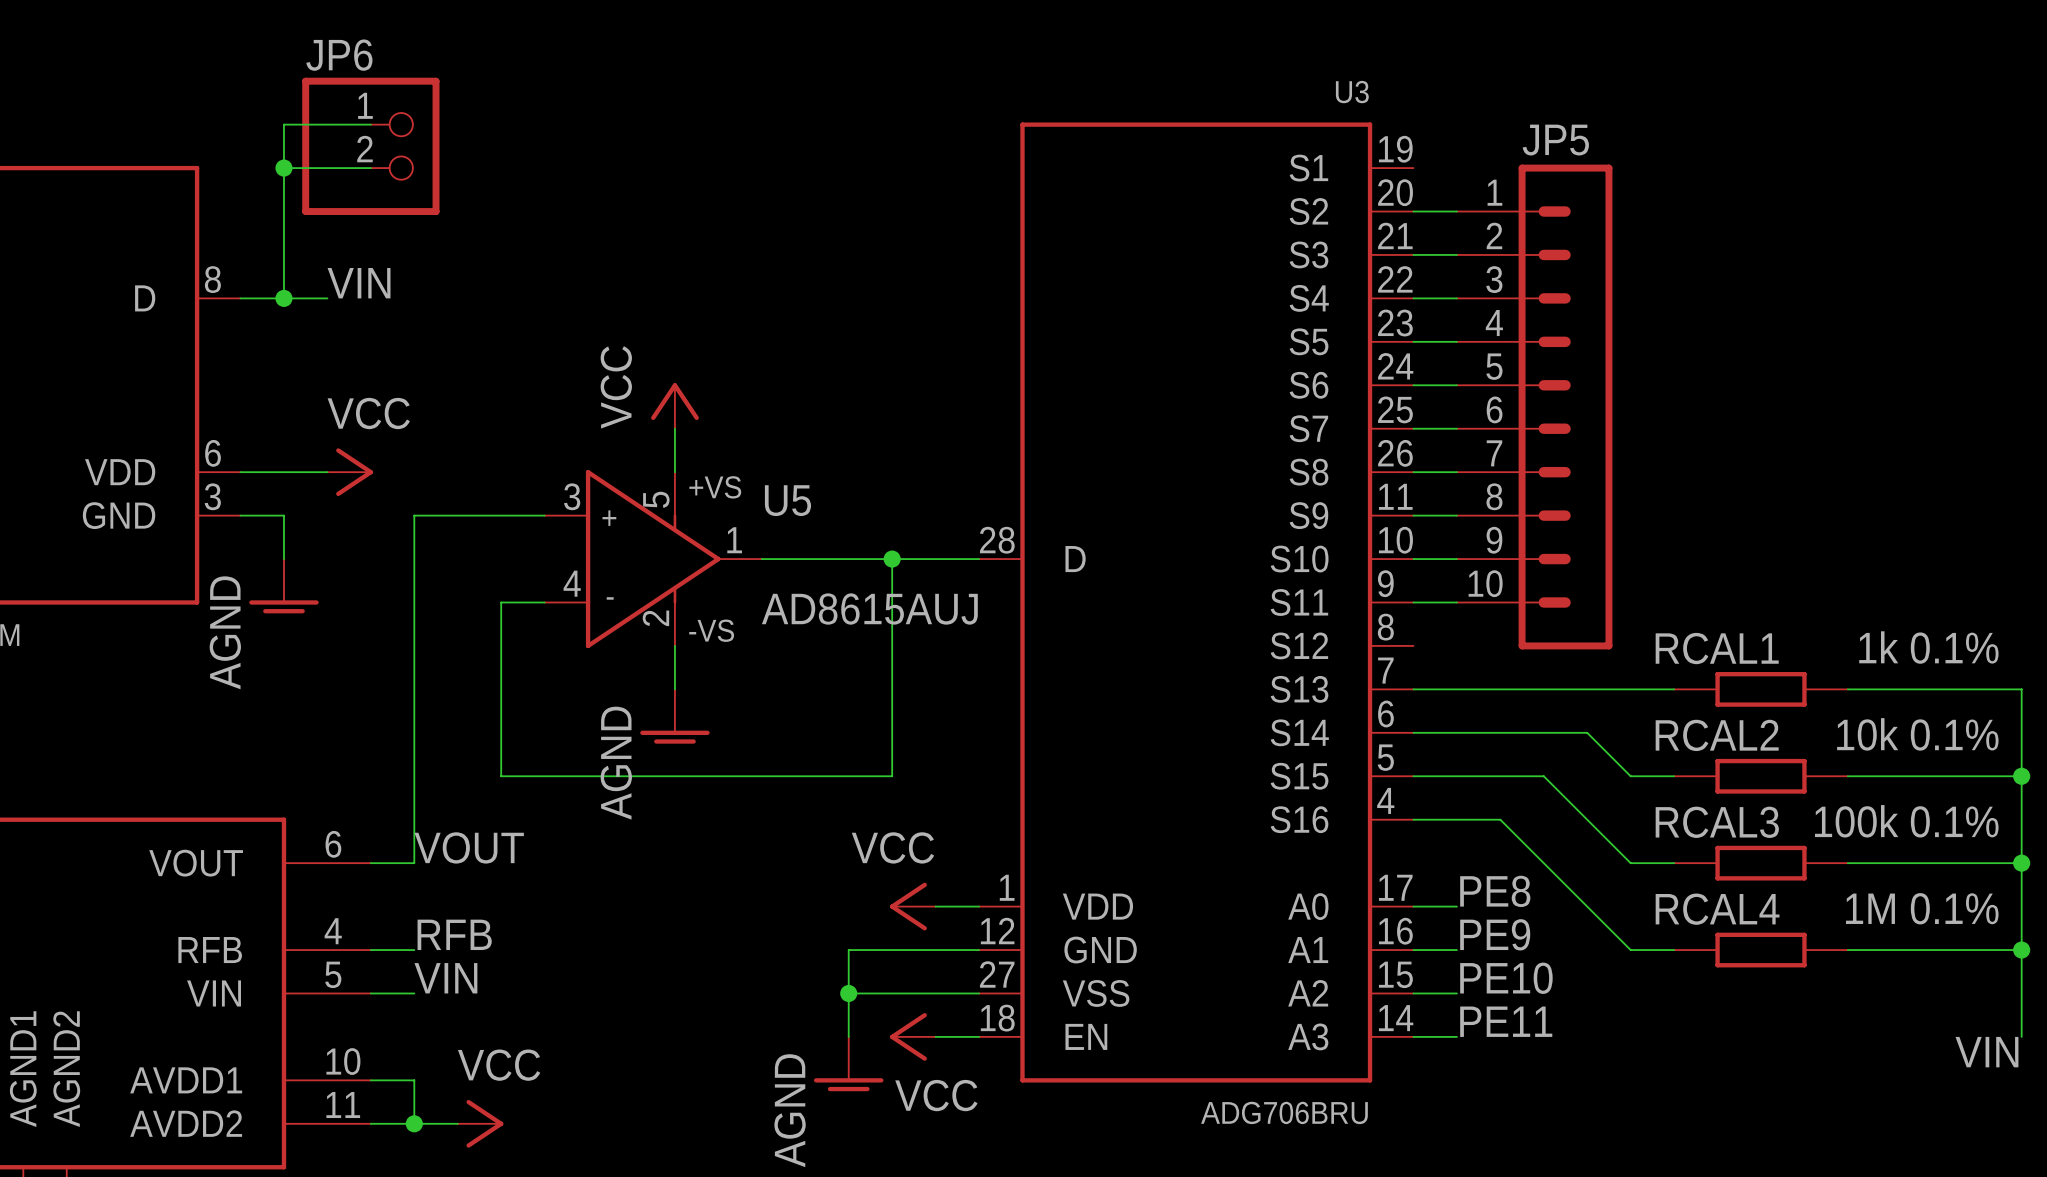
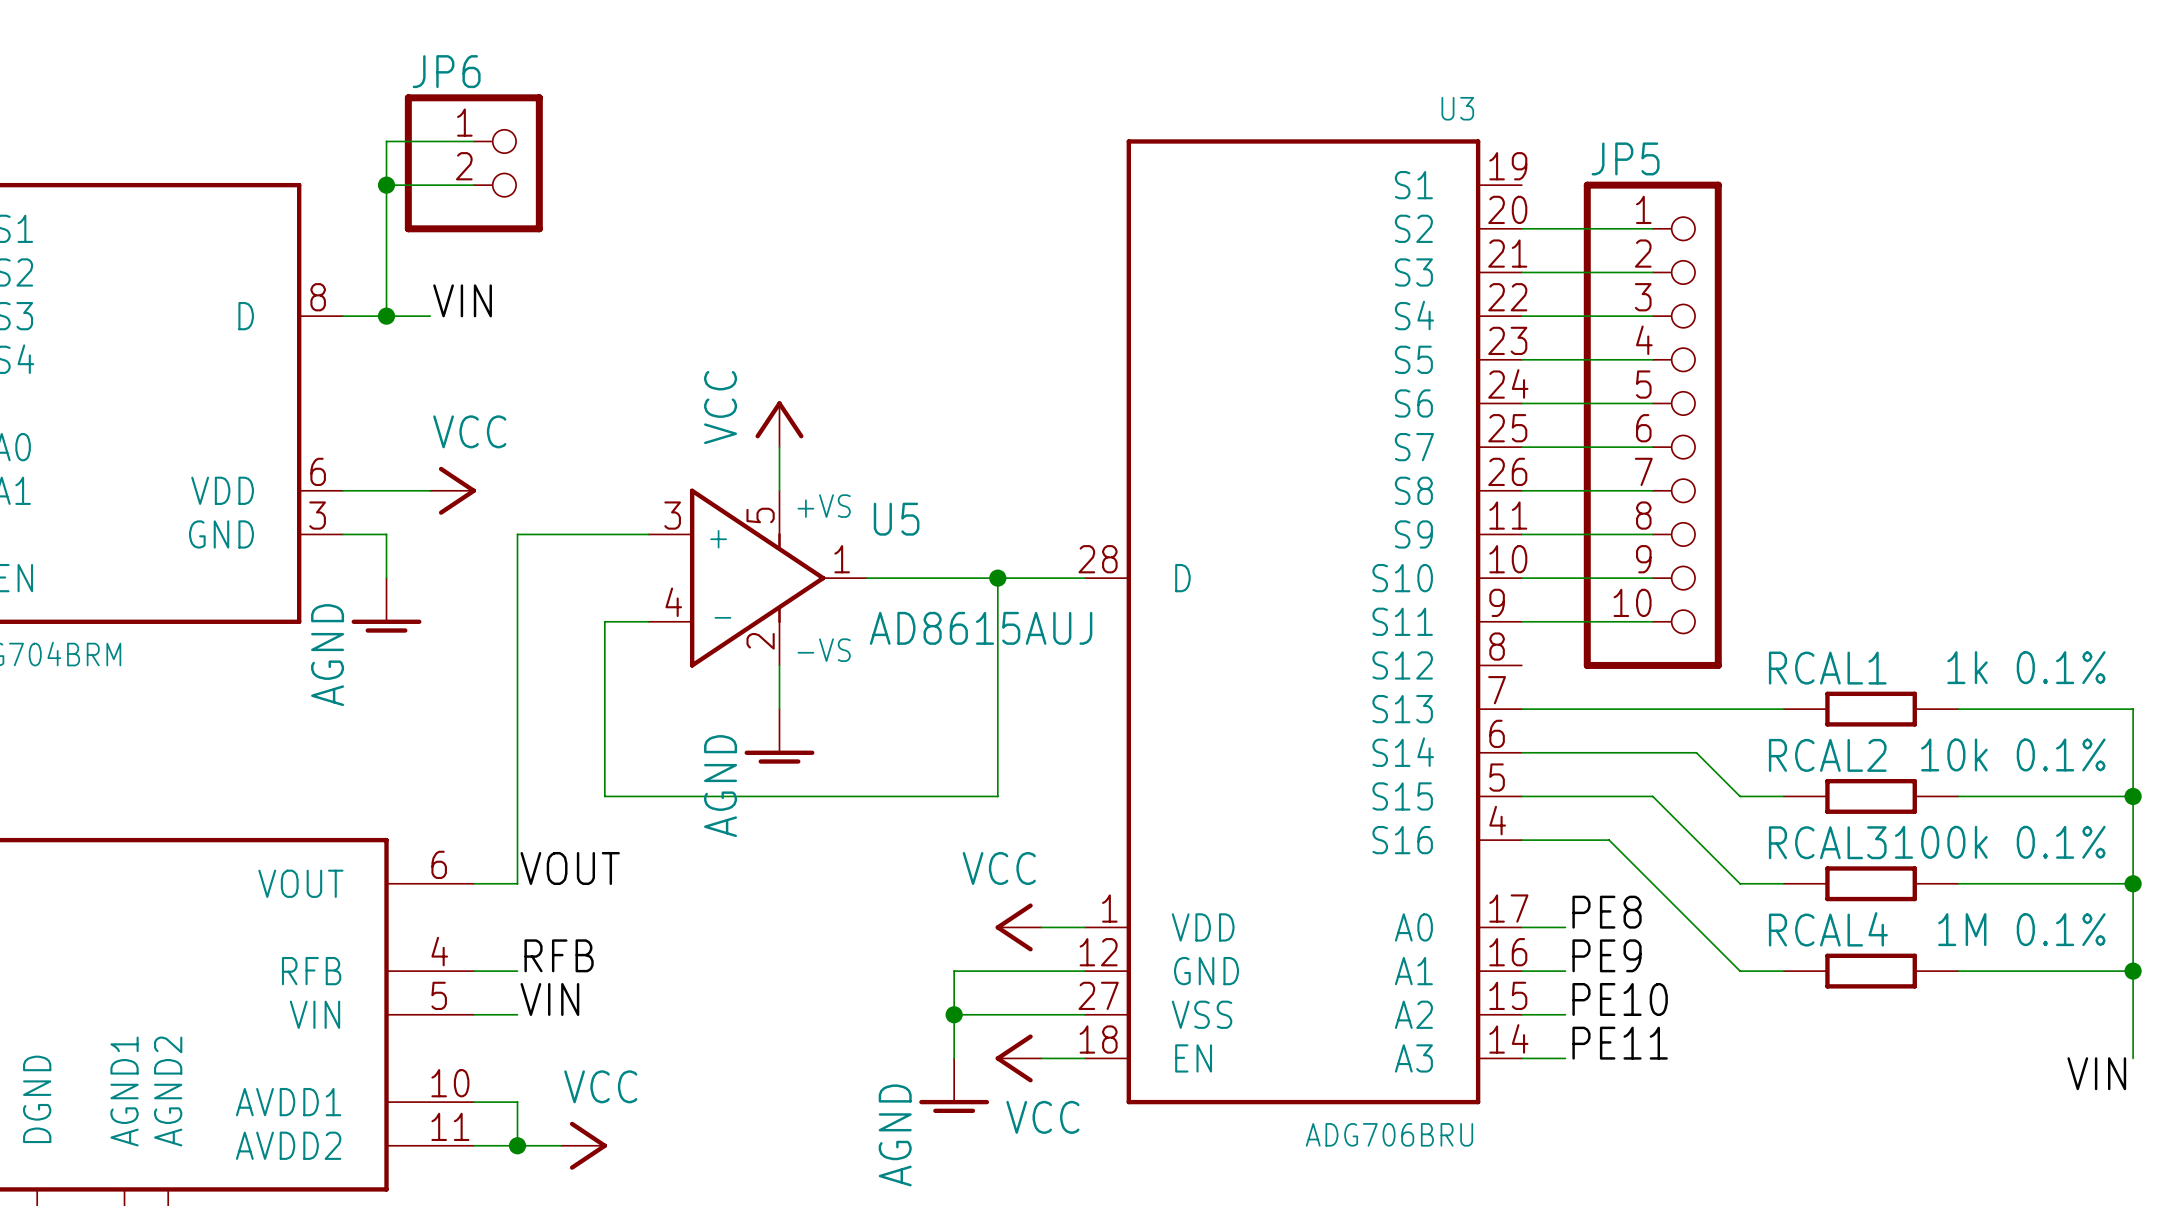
JP5 name position: JP5 (1555, 140) -> JP5 (1625, 158)
JP5 symbol: [1456, 164, 1613, 650] -> [1583, 181, 1722, 669]

